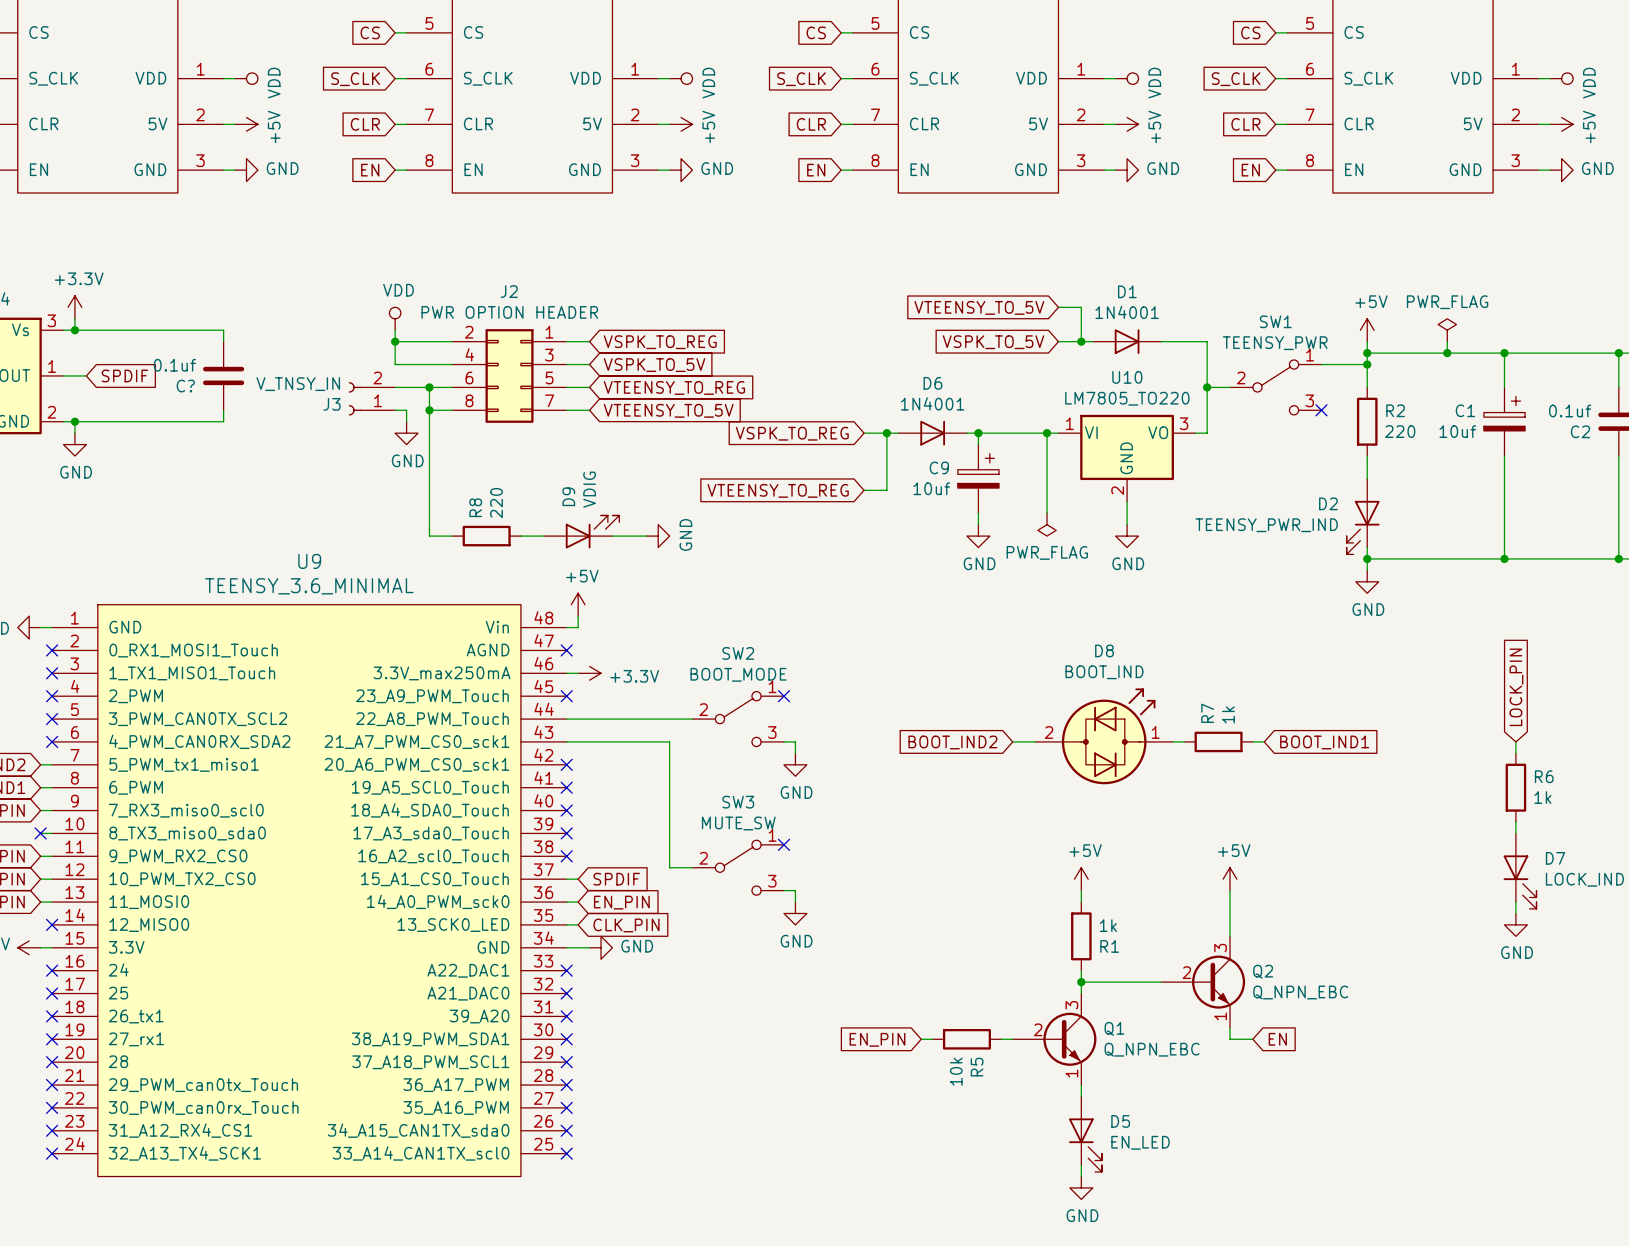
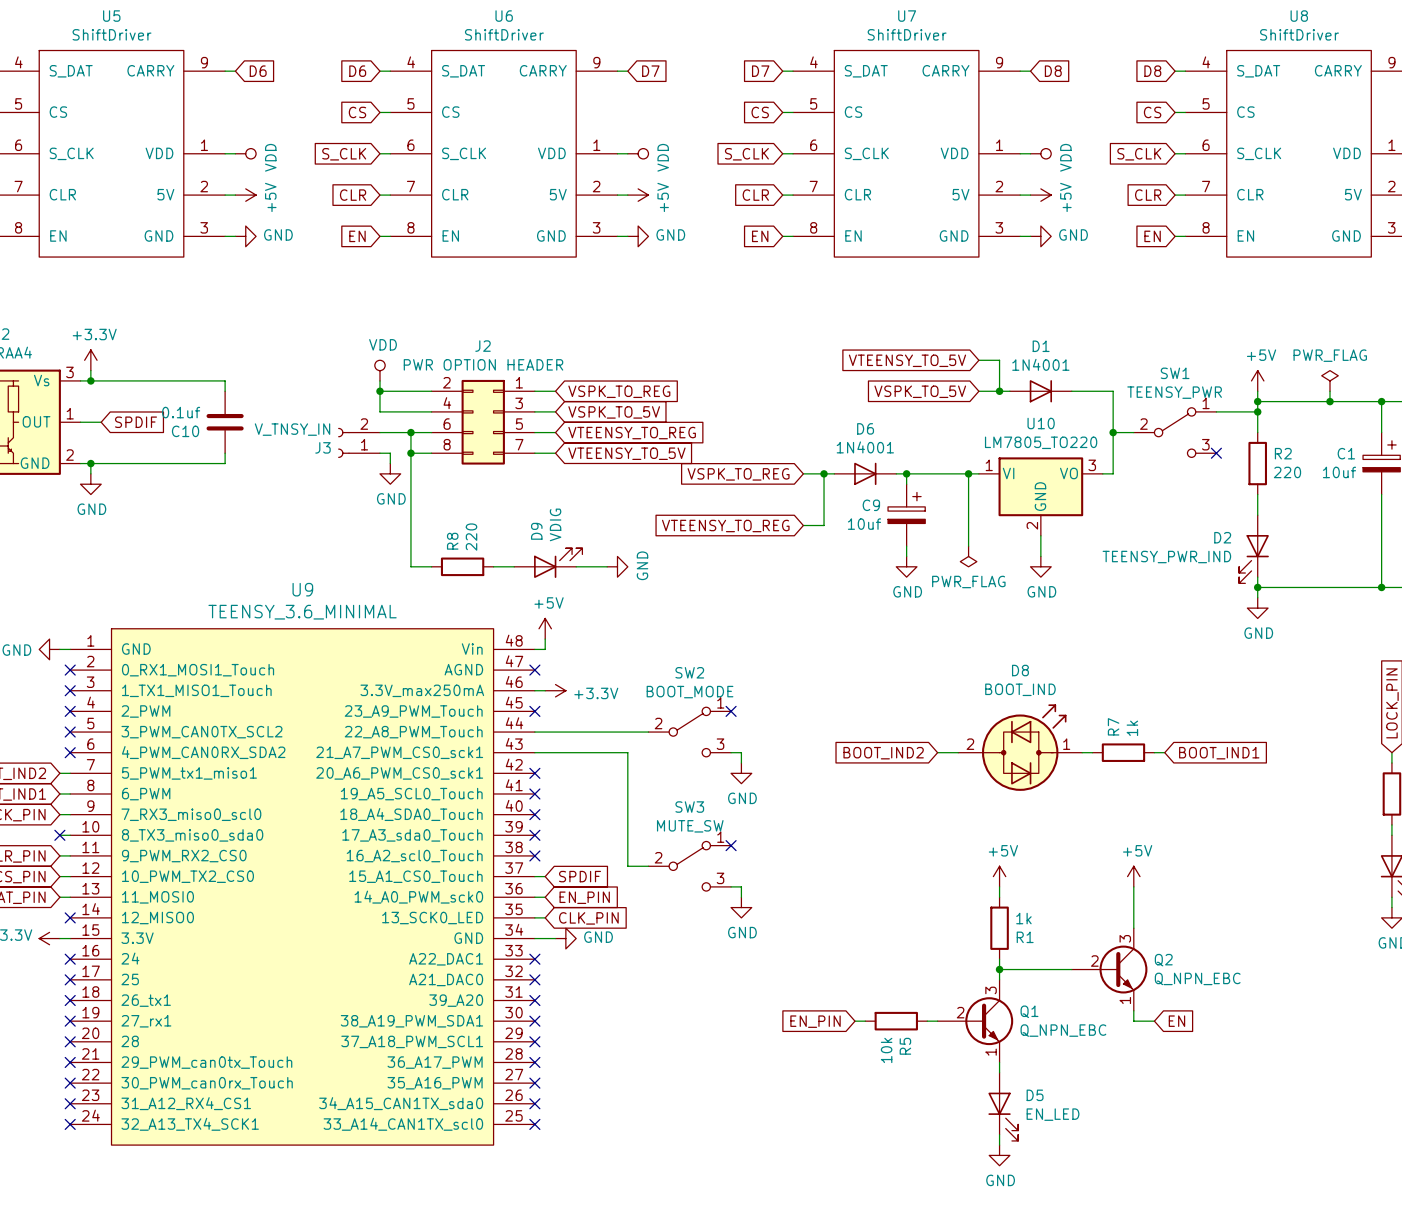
C? name: C? (185, 386) -> C10 (185, 431)

